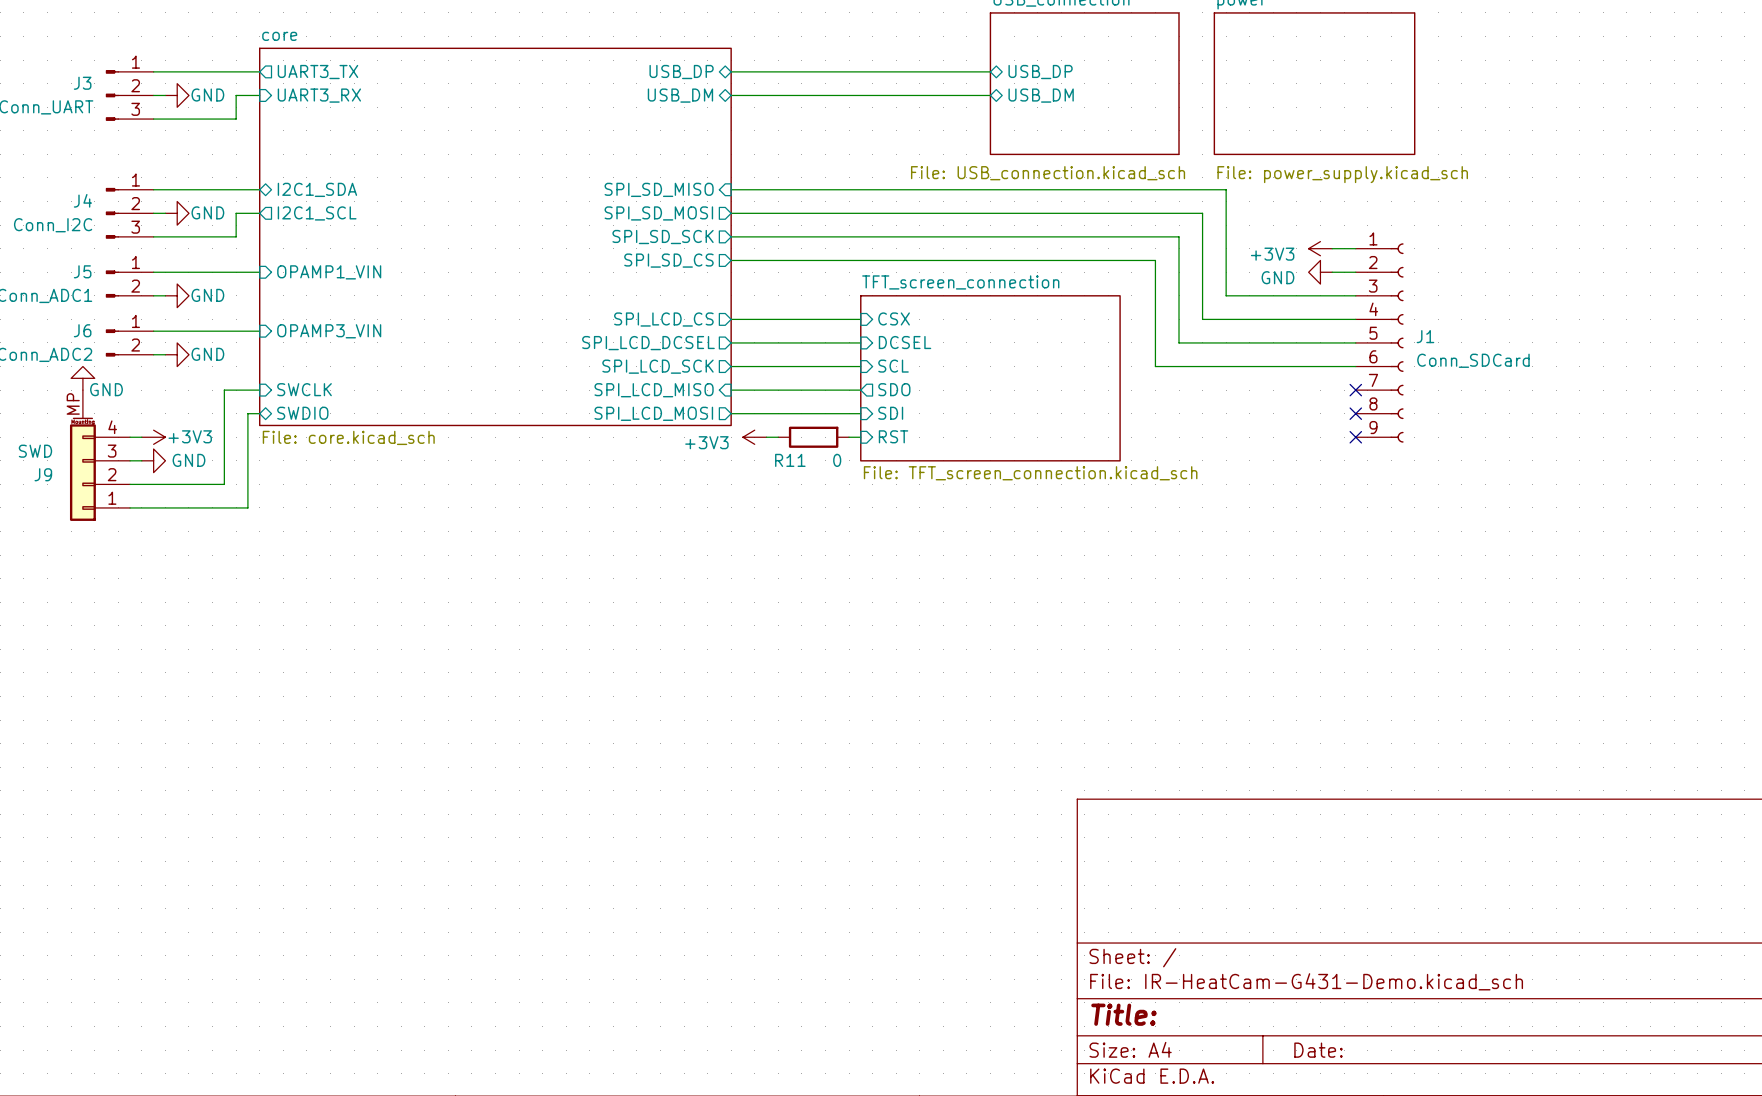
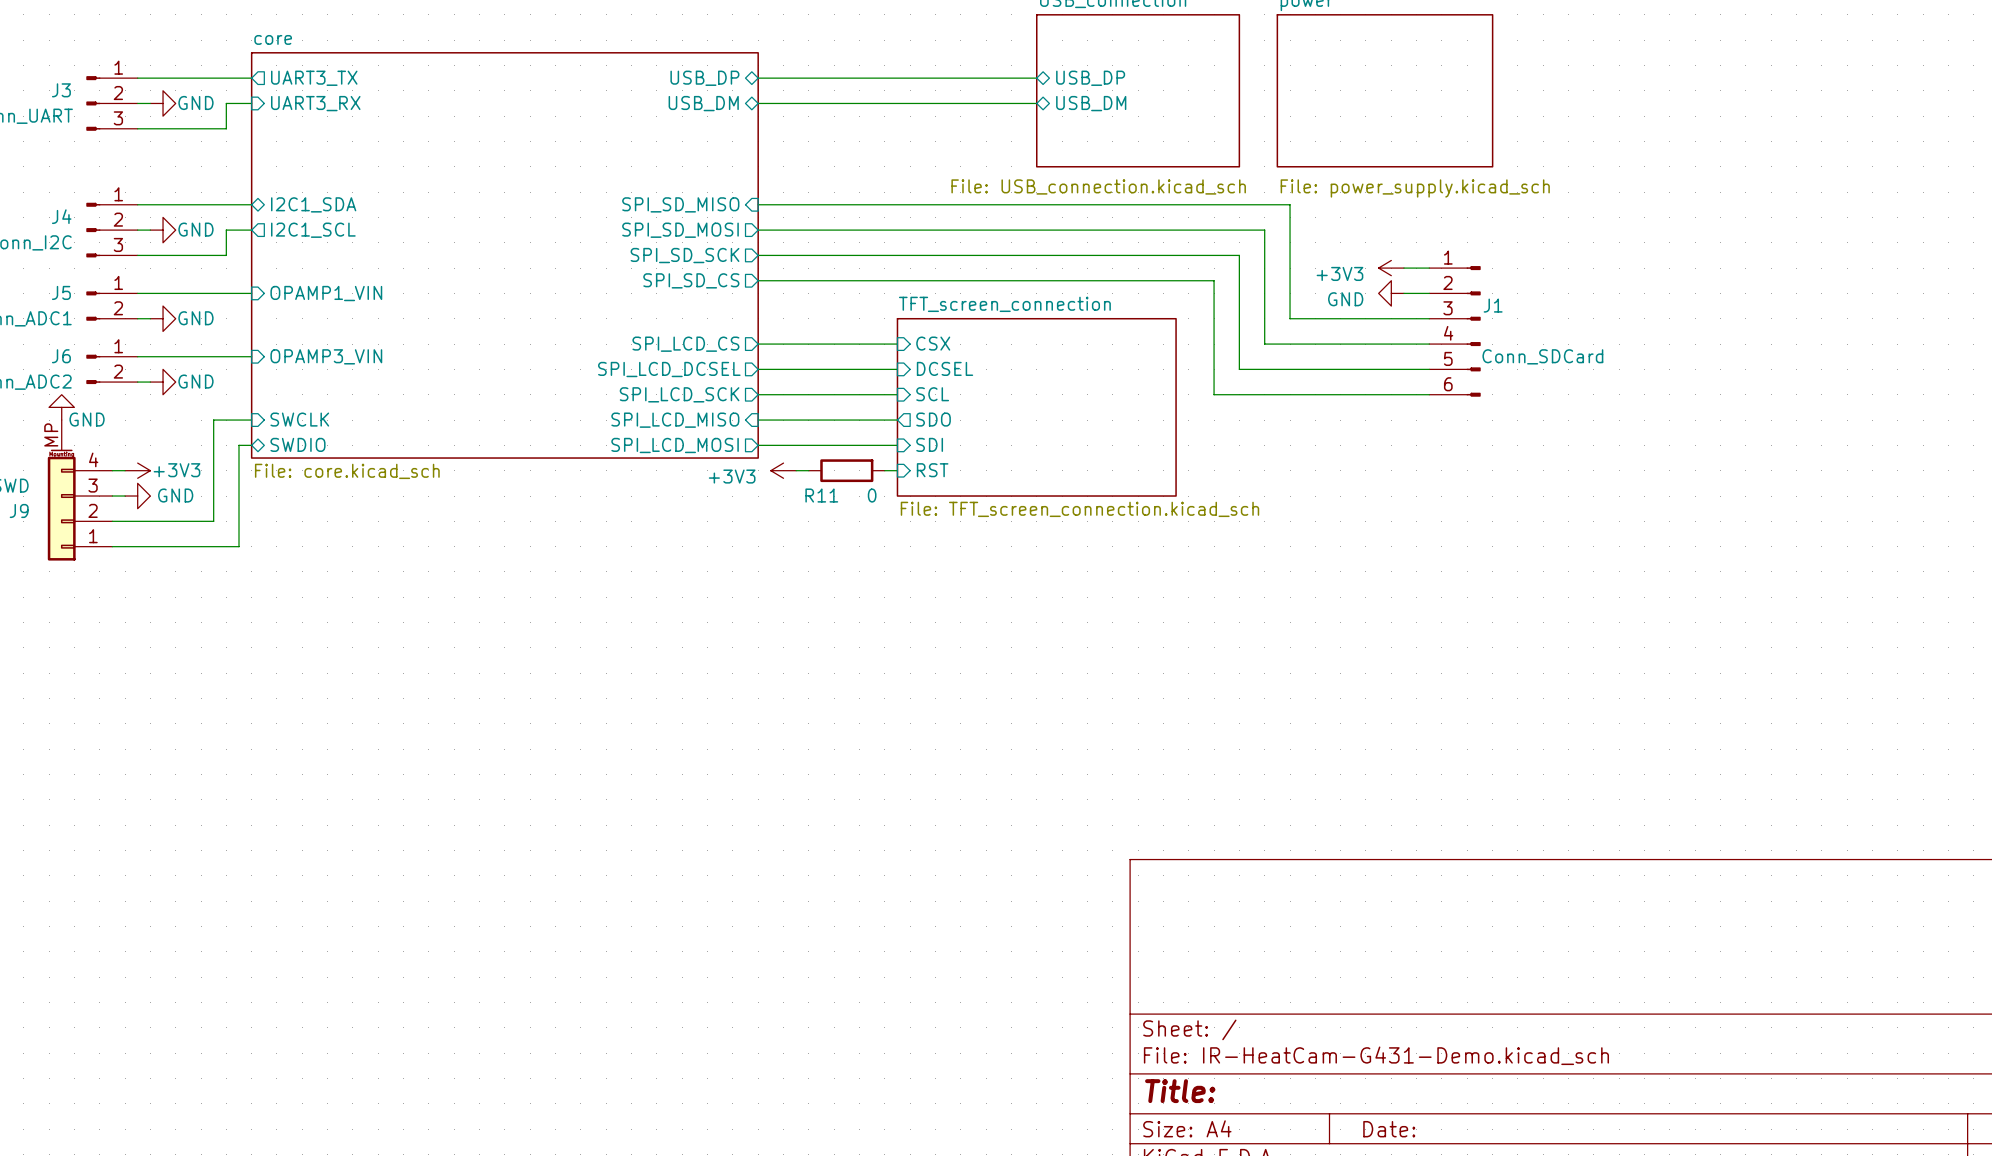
J1 symbol: [1355, 243, 1404, 443] -> [1429, 266, 1481, 397]
J1 name position: J1 (1425, 336) -> J1 (1493, 305)
J1 value position: Conn_SDCard (1473, 360) -> Conn_SDCard (1542, 356)
no-connect mark: (1355, 390) -> none
no-connect mark: (1355, 413) -> none
no-connect mark: (1355, 437) -> none

